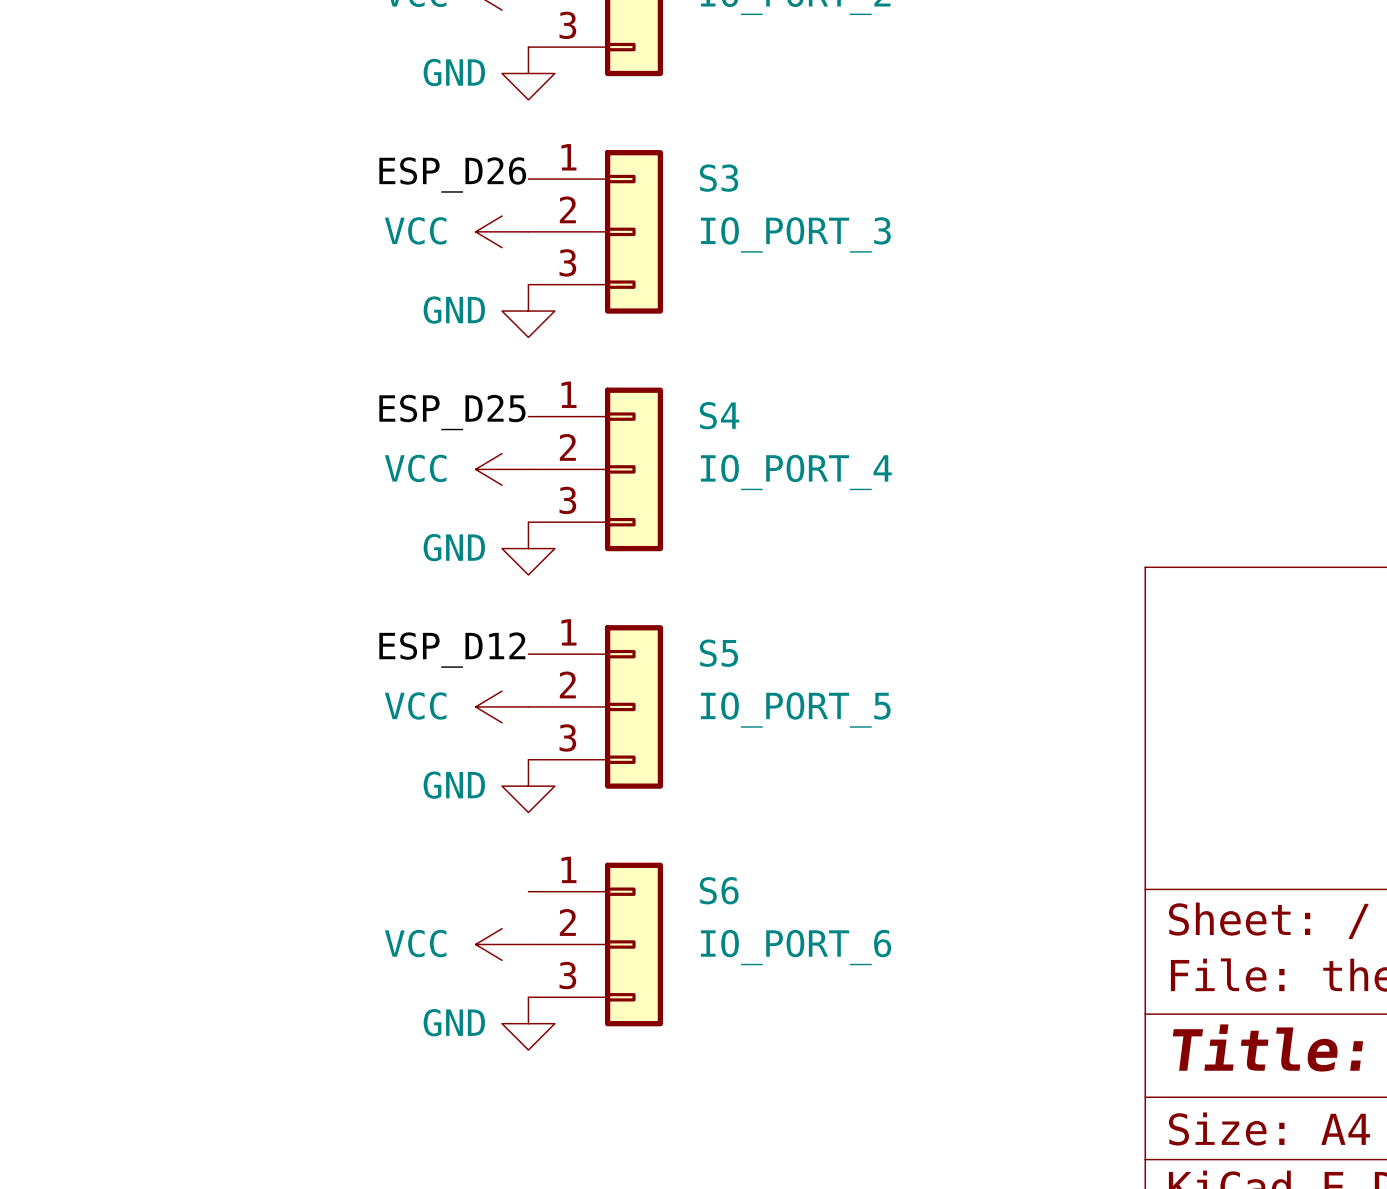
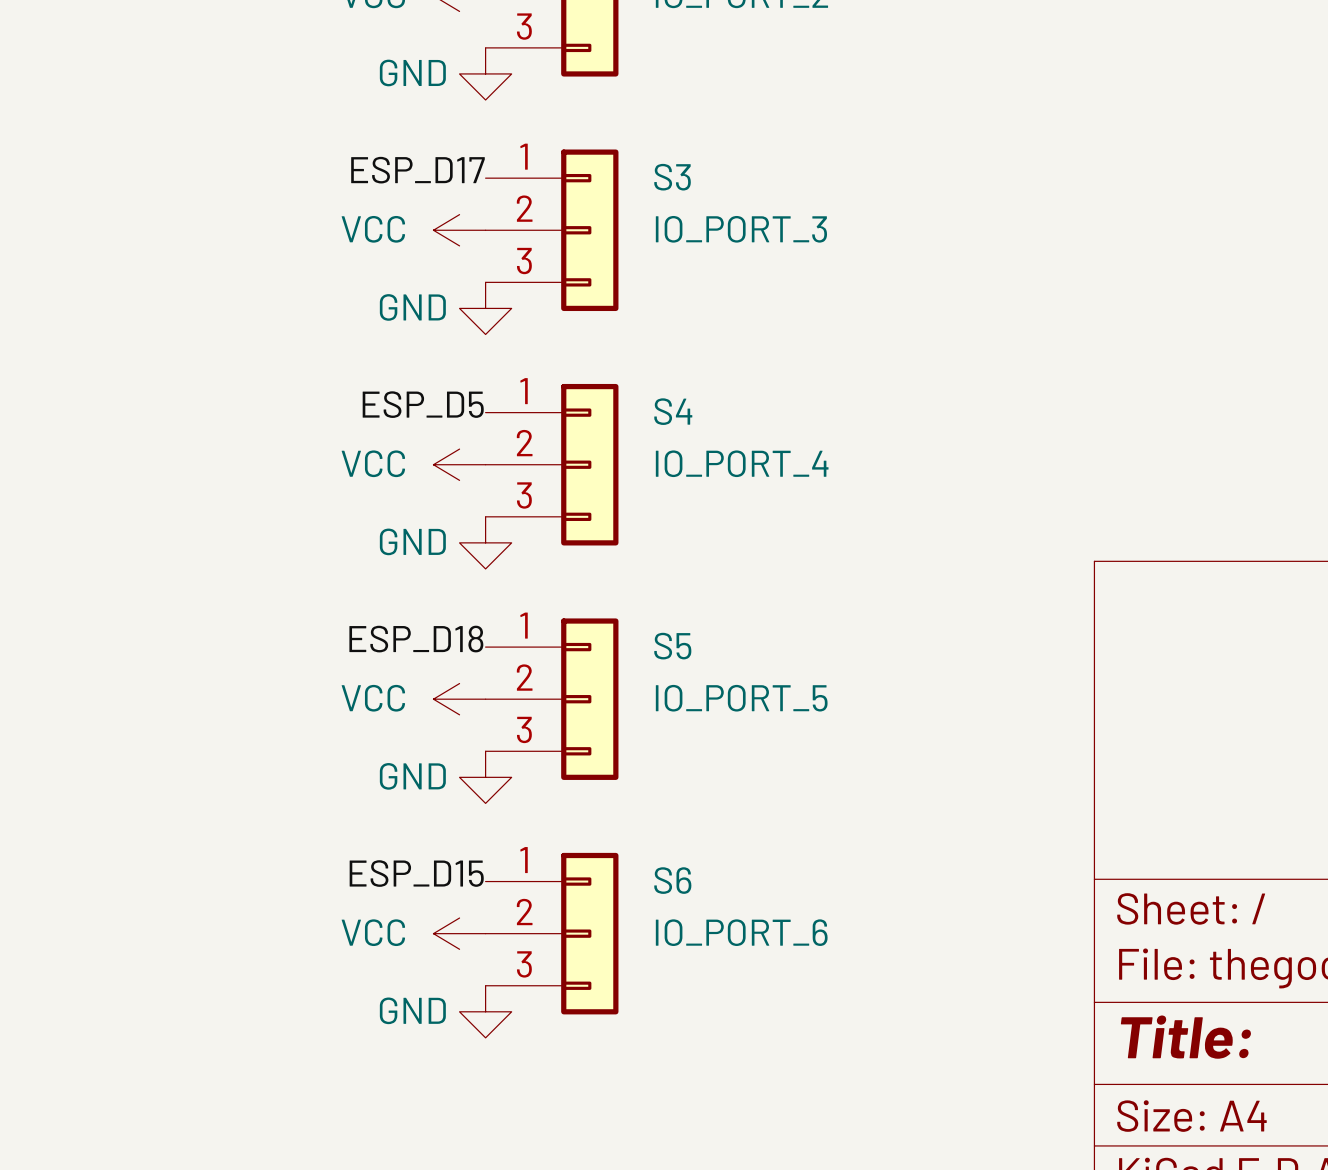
label: ESP_D26 (452, 174) -> ESP_D17 (417, 170)
label: ESP_D25 (452, 412) -> ESP_D5 (423, 404)
label: ESP_D12 (452, 650) -> ESP_D18 (416, 639)
label: none -> ESP_D15 (416, 873)

